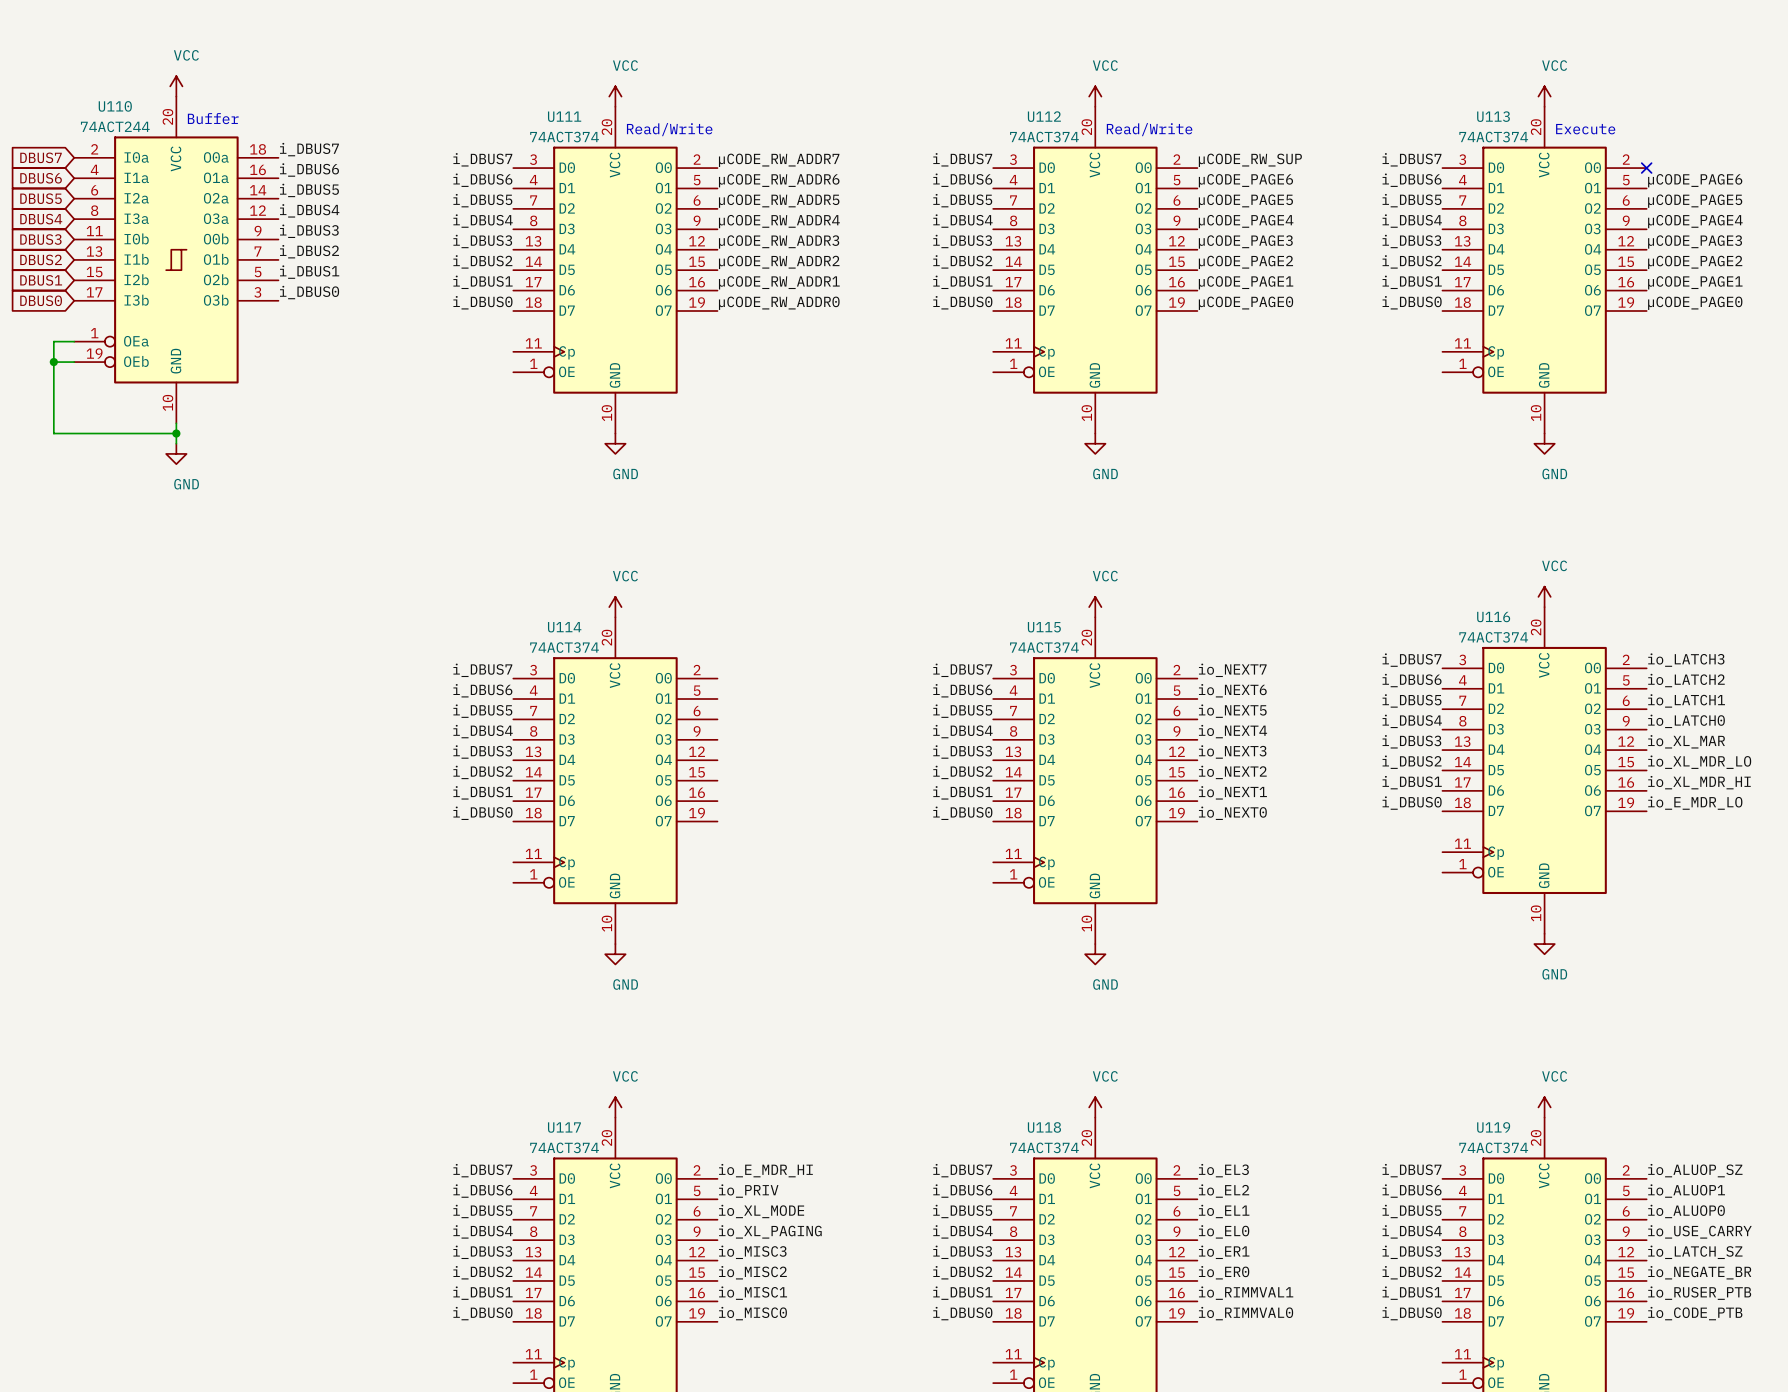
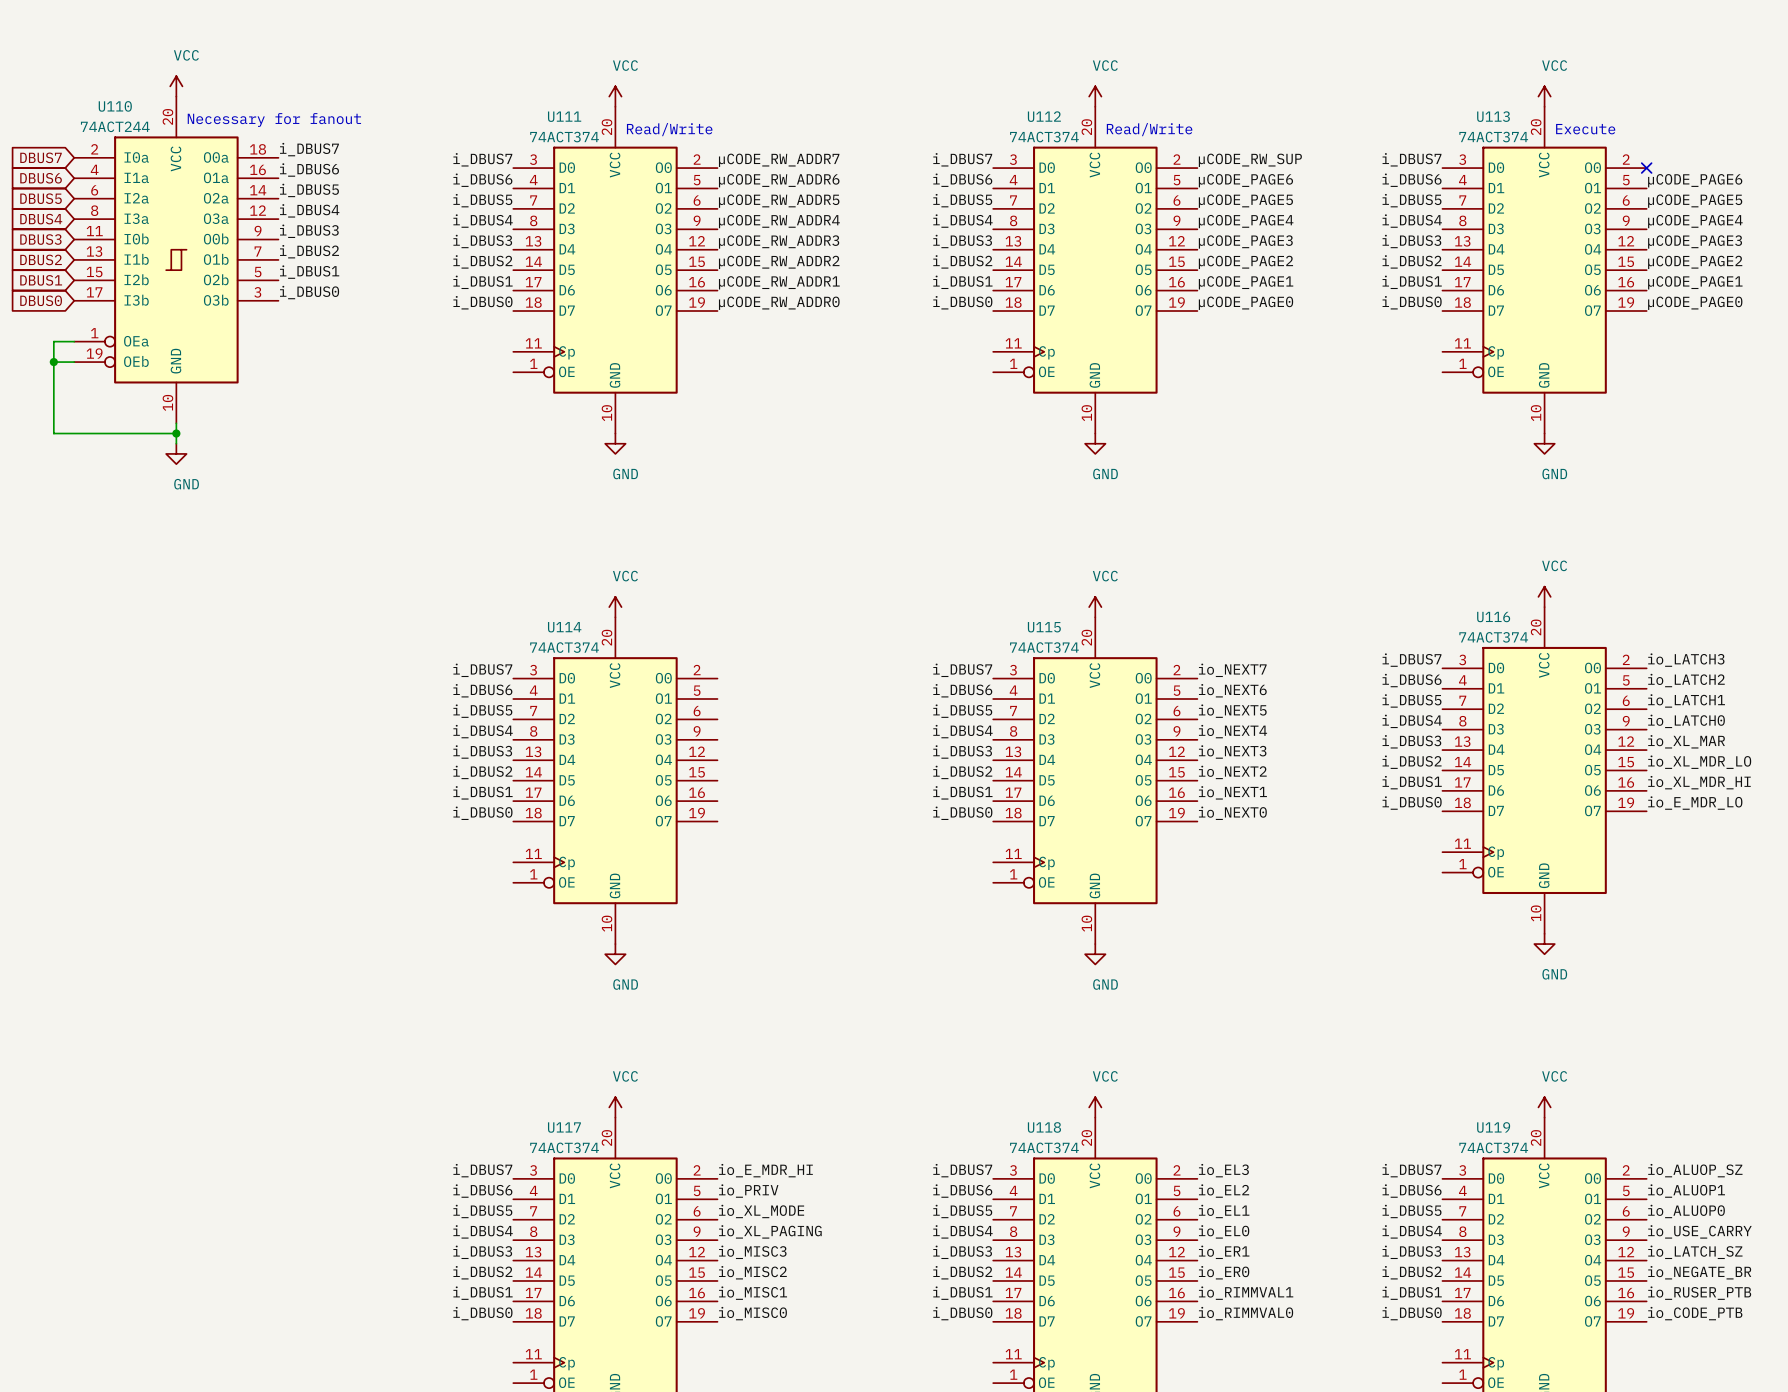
text: Buffer (213, 118) -> Necessary for fanout (274, 120)

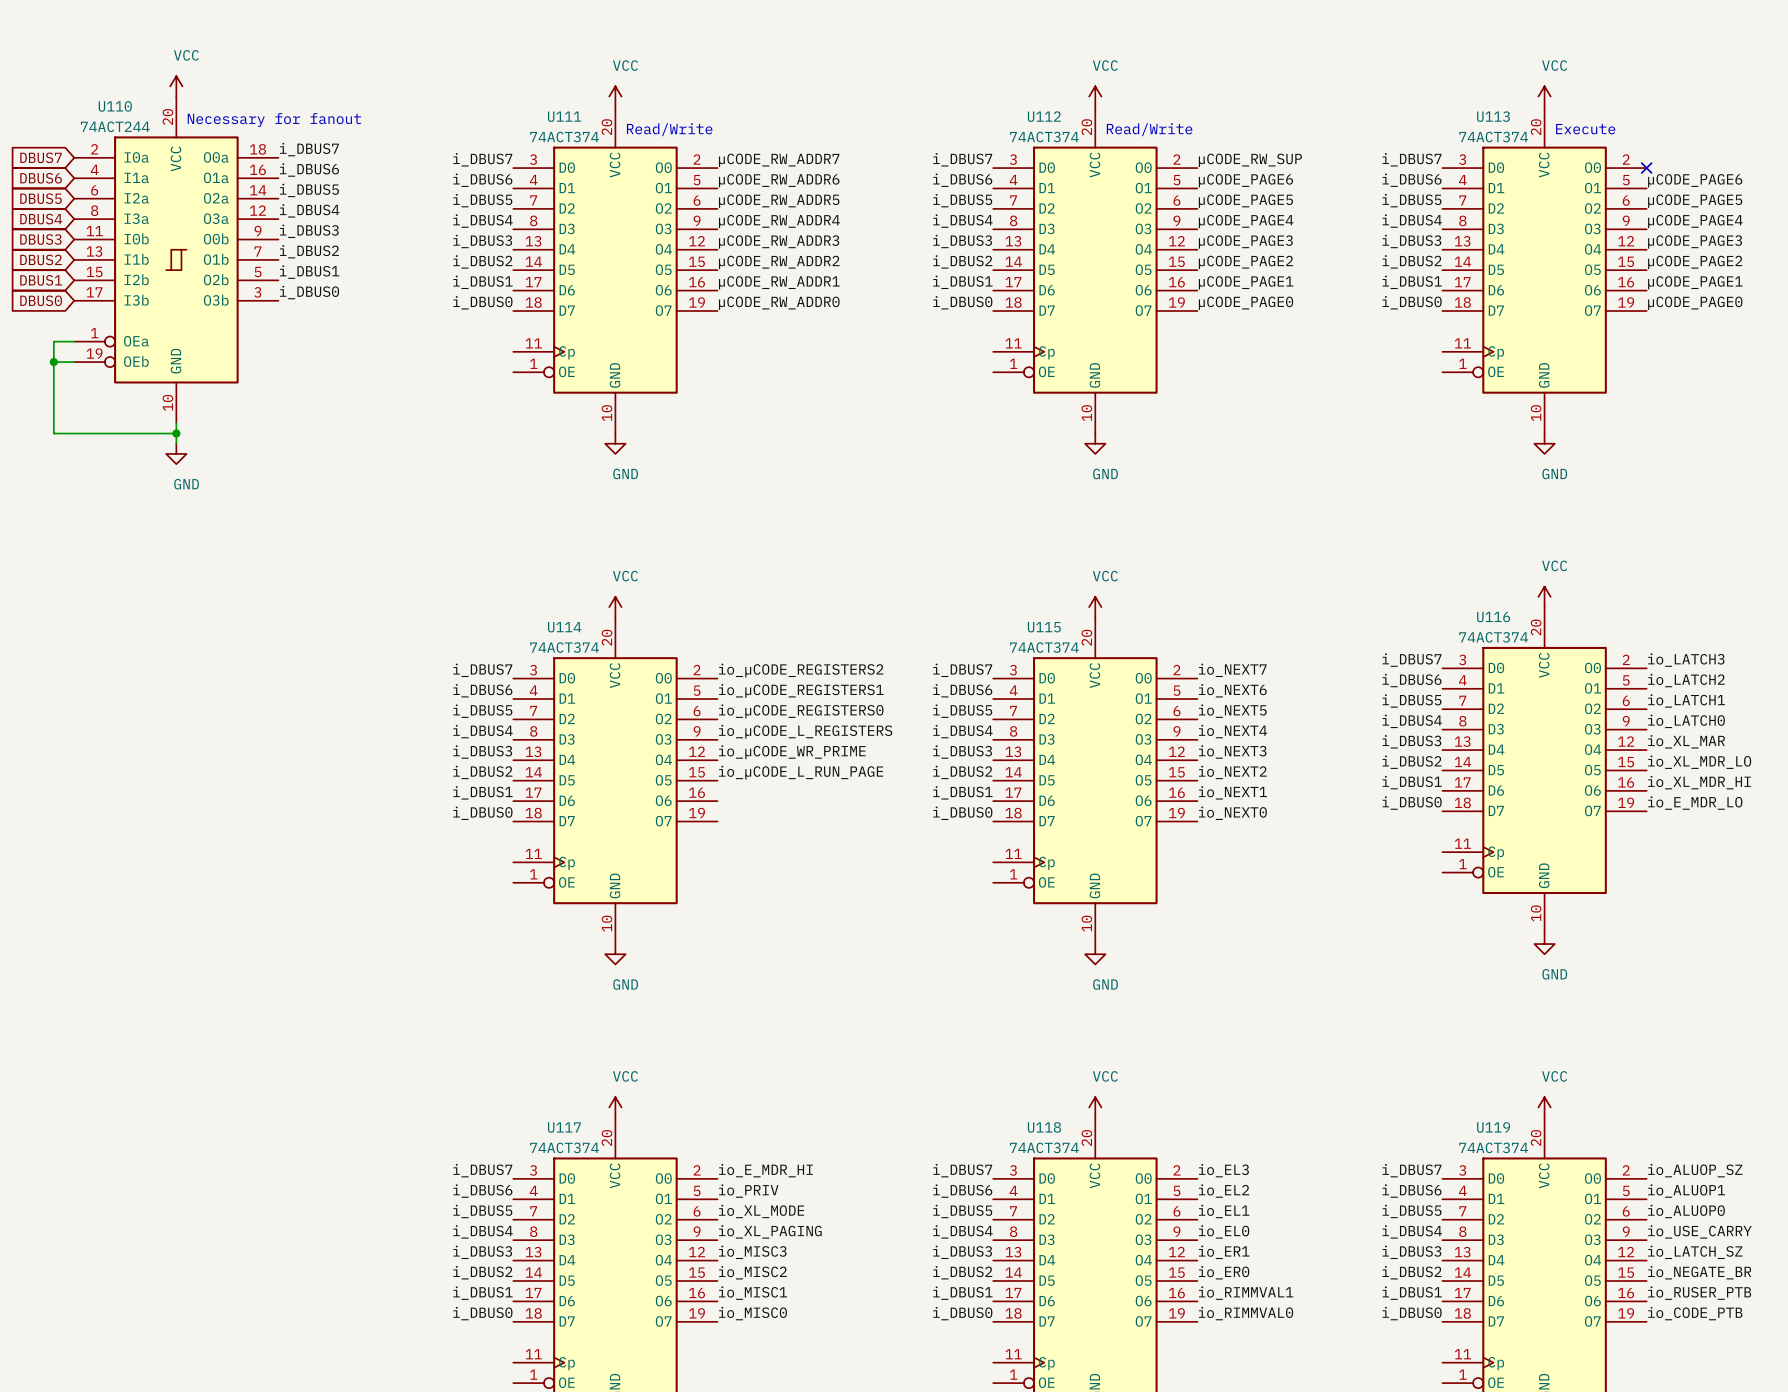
label: none -> io_µCODE_REGISTERS2 (801, 670)
label: none -> io_µCODE_REGISTERS1 (801, 690)
label: none -> io_µCODE_REGISTERS0 (801, 711)
label: none -> io_µCODE_L_REGISTERS (805, 731)
label: none -> io_µCODE_WR_PRIME (792, 752)
label: none -> io_µCODE_L_RUN_PAGE (801, 772)

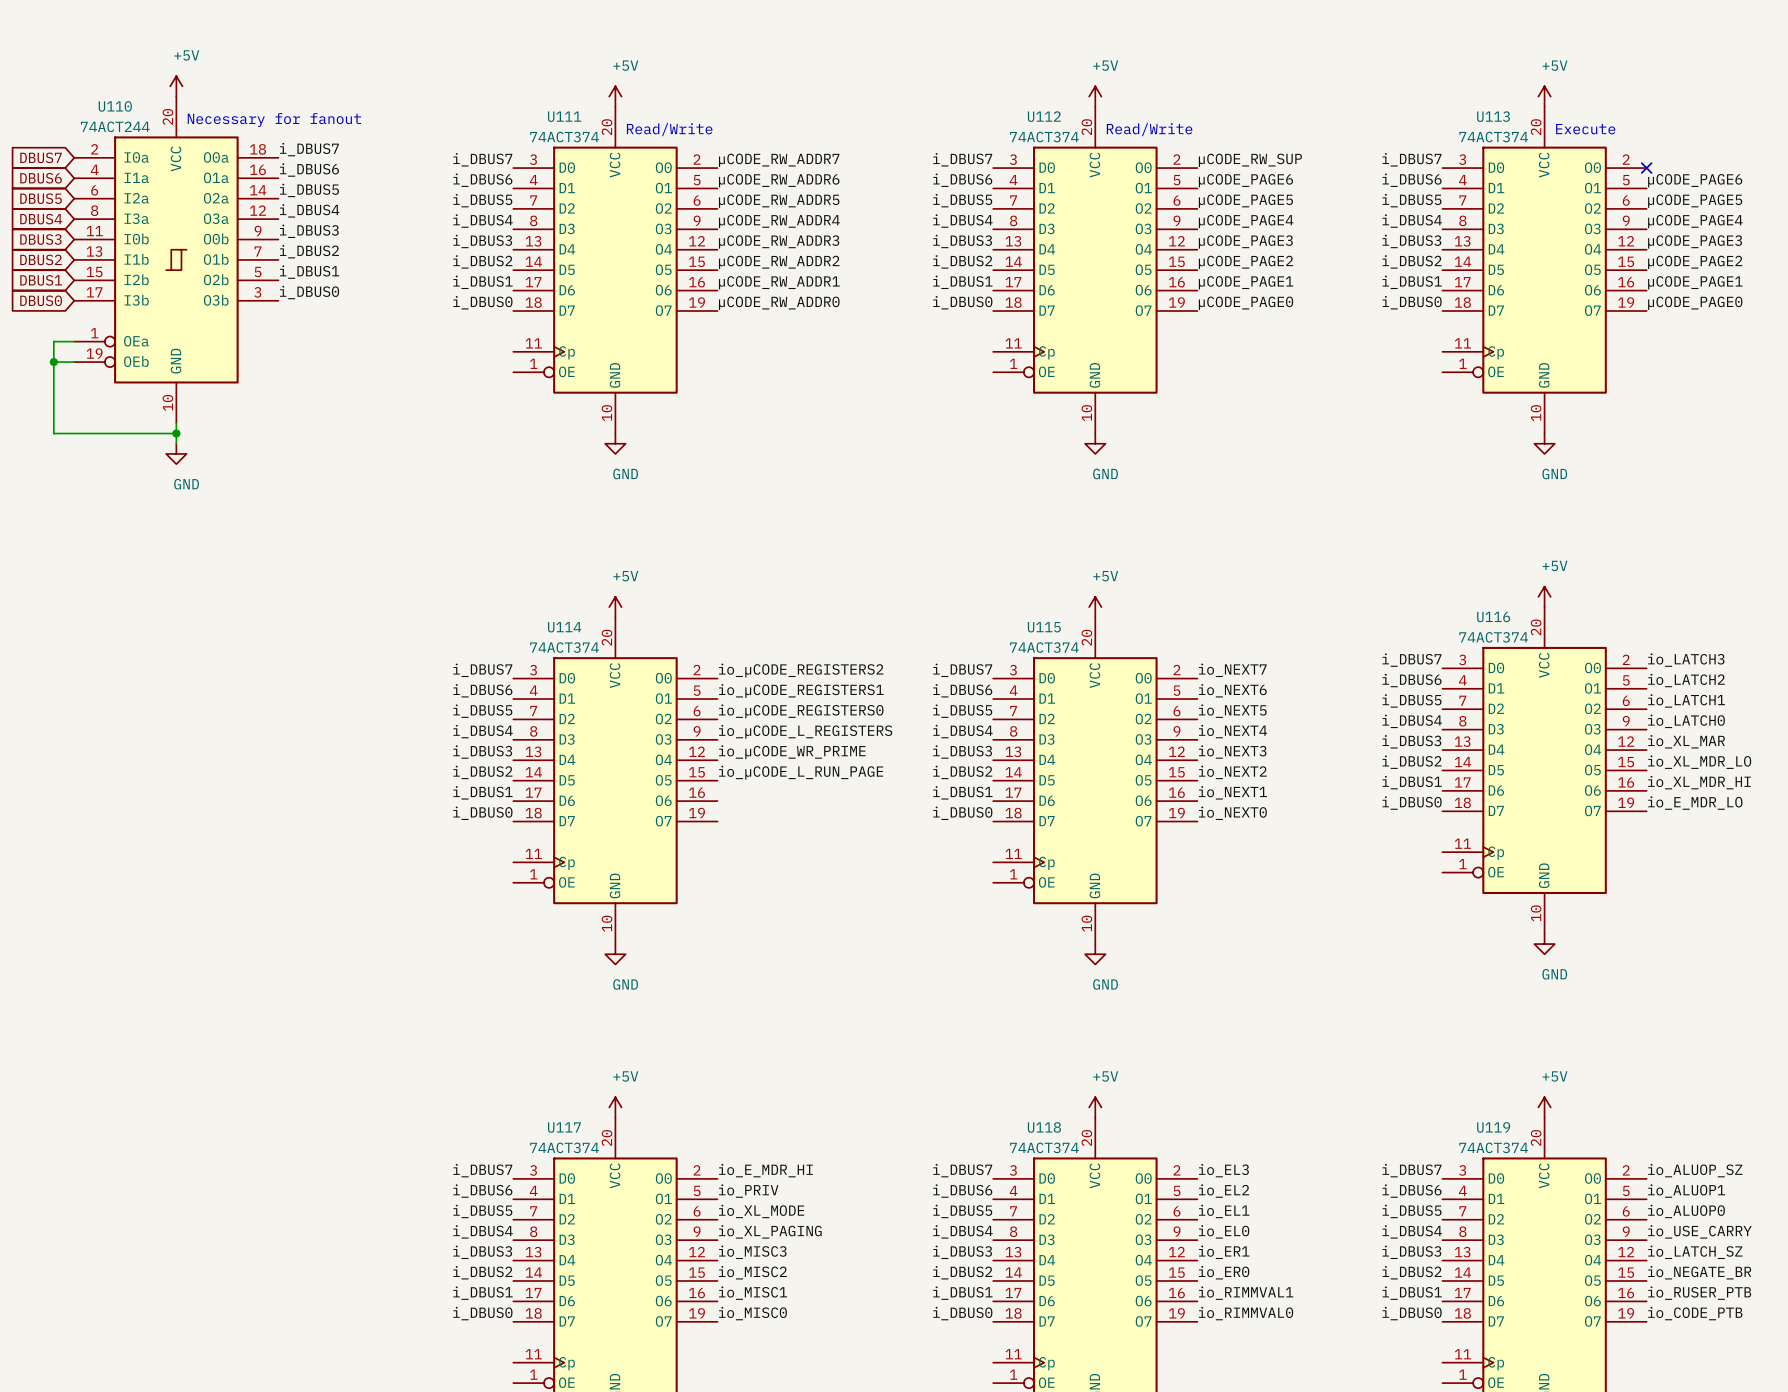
power symbol: VCC (176, 86) -> +5V (176, 86)
power symbol: VCC (615, 96) -> +5V (615, 96)
power symbol: VCC (1095, 96) -> +5V (1095, 96)
power symbol: VCC (1544, 96) -> +5V (1544, 96)
power symbol: VCC (1544, 596) -> +5V (1544, 596)
power symbol: VCC (615, 607) -> +5V (615, 607)
power symbol: VCC (1095, 607) -> +5V (1095, 607)
power symbol: VCC (615, 1107) -> +5V (615, 1107)
power symbol: VCC (1095, 1107) -> +5V (1095, 1107)
power symbol: VCC (1544, 1107) -> +5V (1544, 1107)

